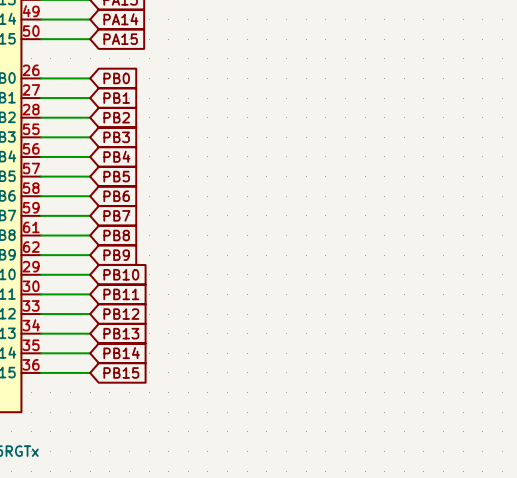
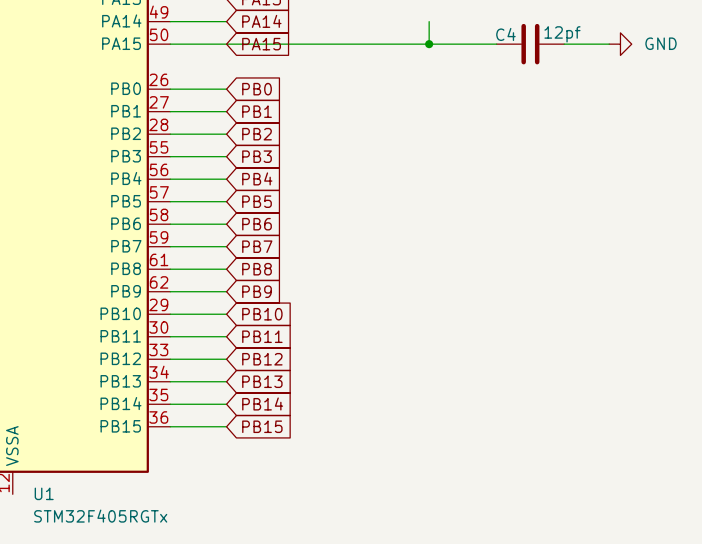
wire: none -> (429, 21) (429, 44)
wire: none -> (226, 44) (496, 44)
junction: none -> (429, 44)
C4: none -> 12pf (530, 44)
wire: none -> (564, 44) (609, 44)
power symbol: none -> GND (620, 44)

